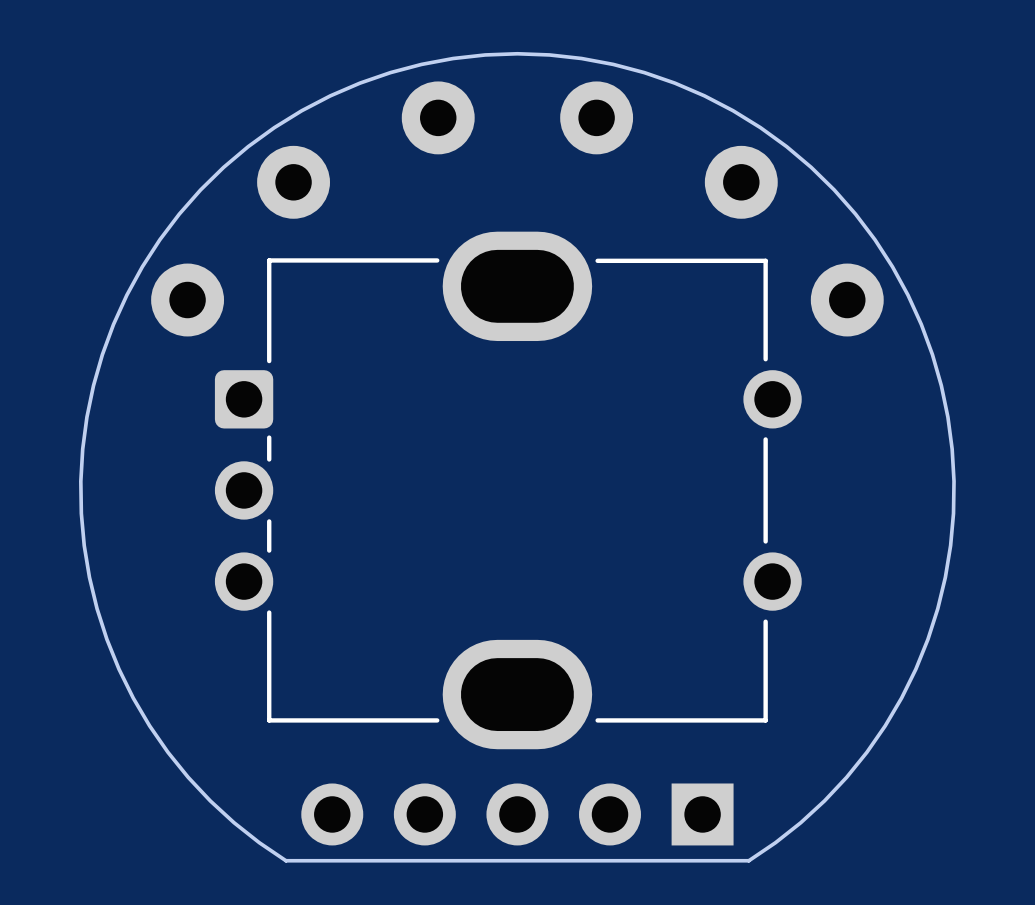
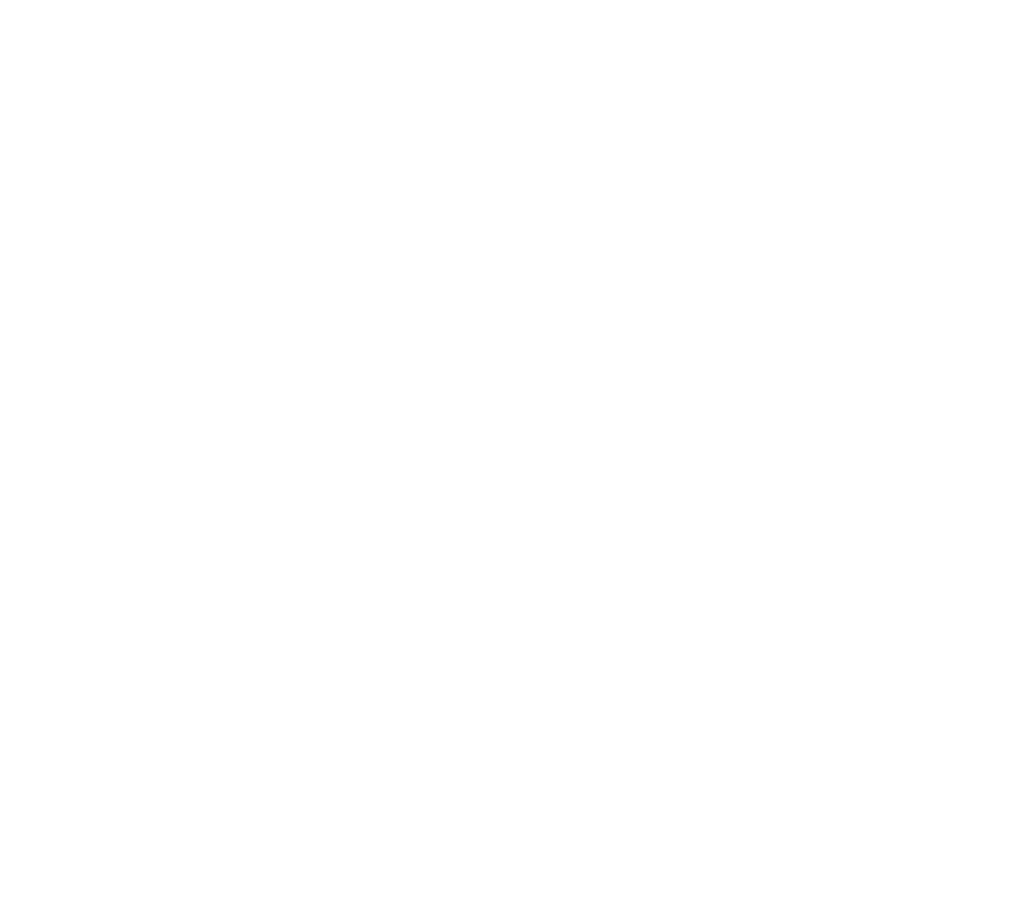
part: (517, 208) -> none
part: (508, 490) -> none
part: (517, 814) -> none
board edge: (748, 860) (285, 860) (259, 842) (210, 800) (188, 777) (149, 725) (119, 669) (106, 639) (97, 608) (84, 545) (80, 481) (82, 449) (93, 385) (113, 324) (126, 295) (159, 239) (200, 189) (248, 146) (274, 127) (330, 95) (359, 83) (390, 72) (453, 58) (517, 53) (581, 58) (613, 64) (674, 83) (704, 95) (760, 127) (811, 167) (834, 189) (855, 214) (892, 266) (921, 324) (932, 354) (947, 417) (954, 481) (950, 545) (945, 577) (927, 639) (901, 698) (885, 725) (866, 752) (824, 800) (775, 842) (748, 860) -> none

